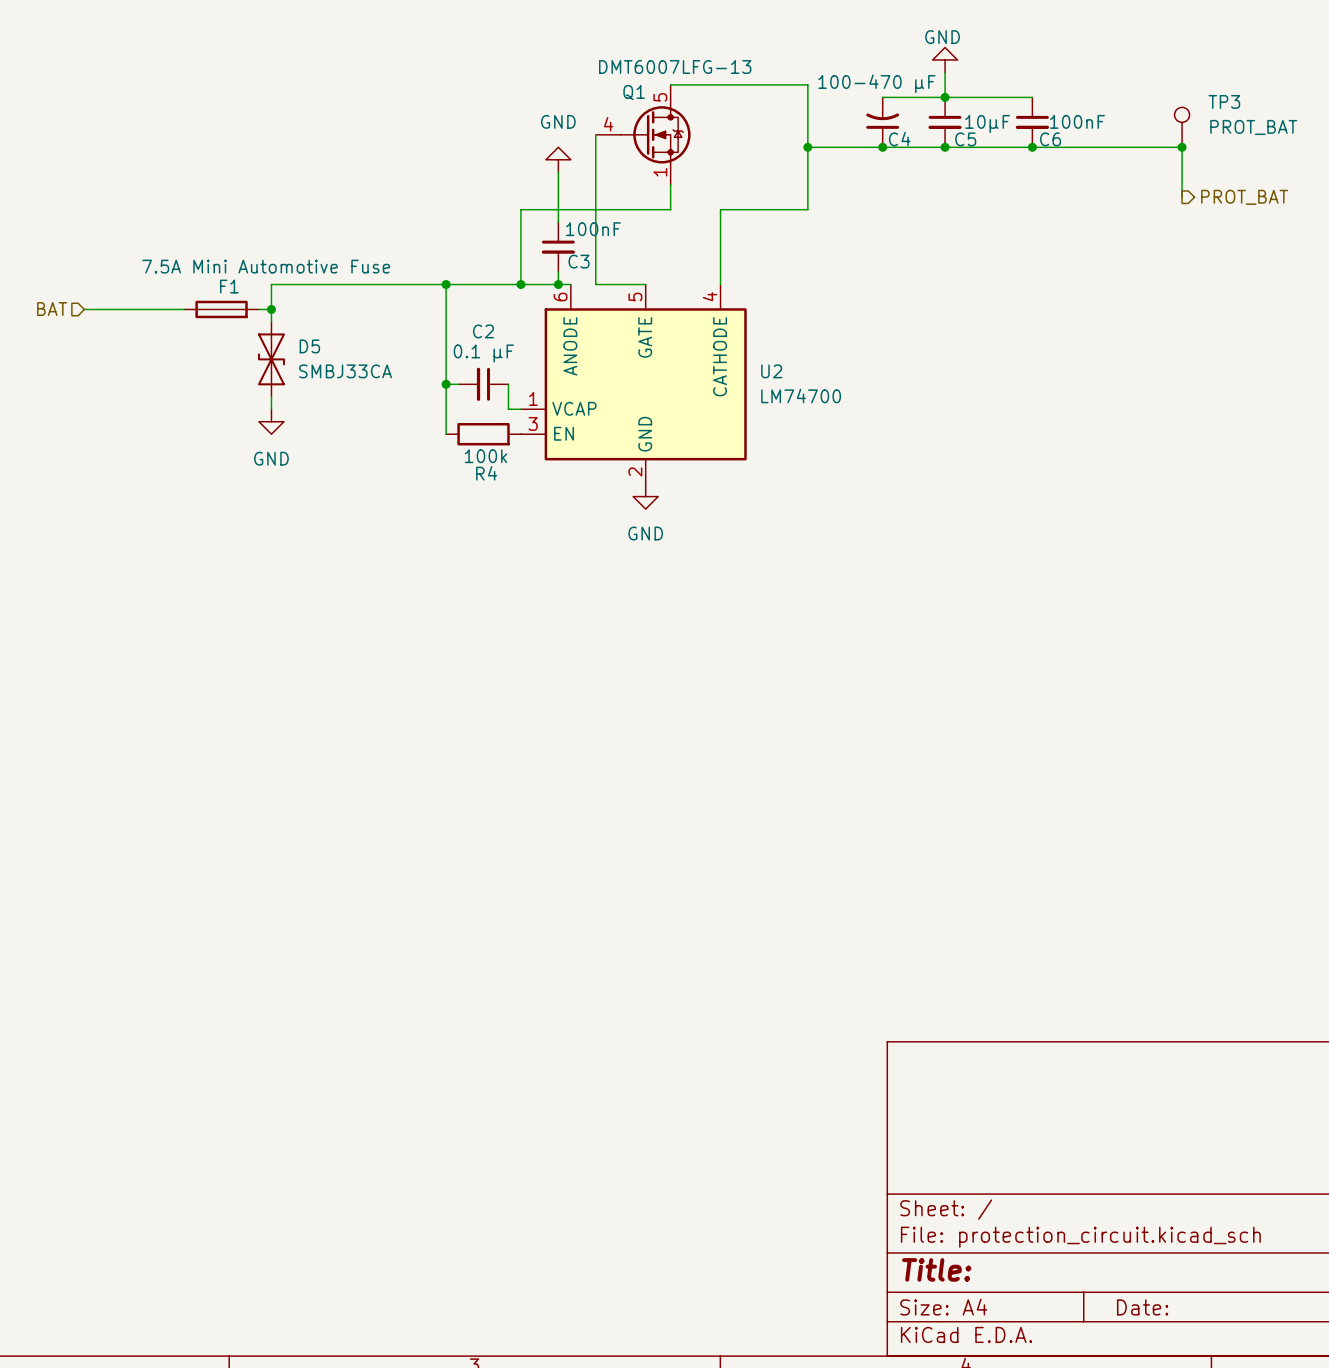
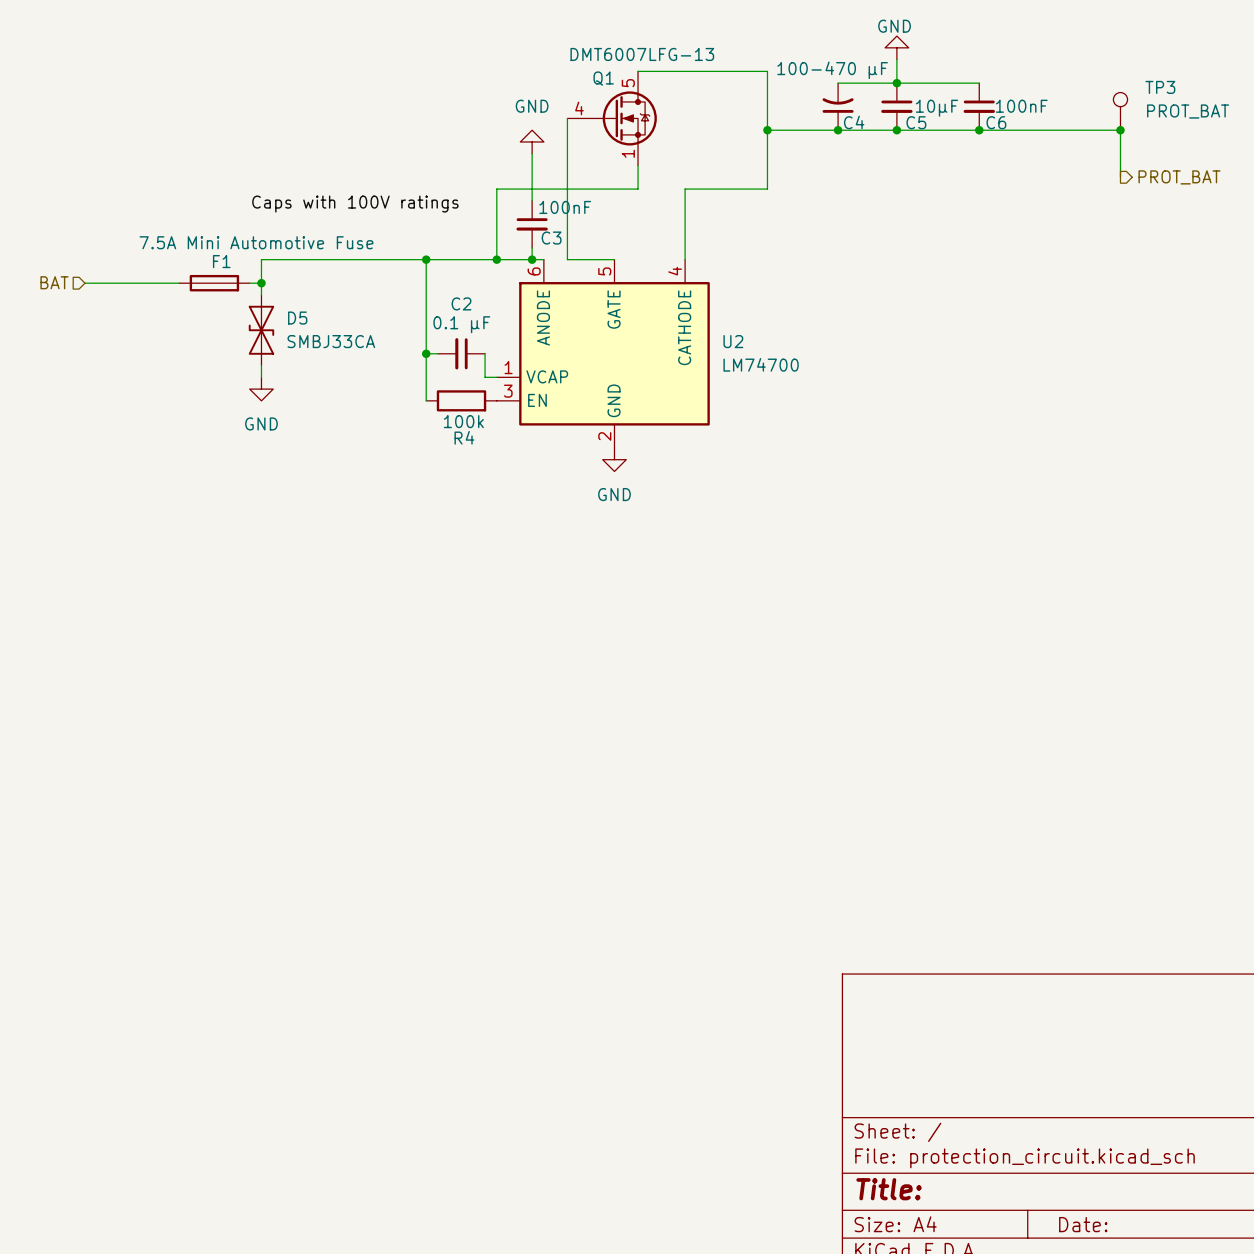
label: none -> Caps with 100V ratings (355, 204)

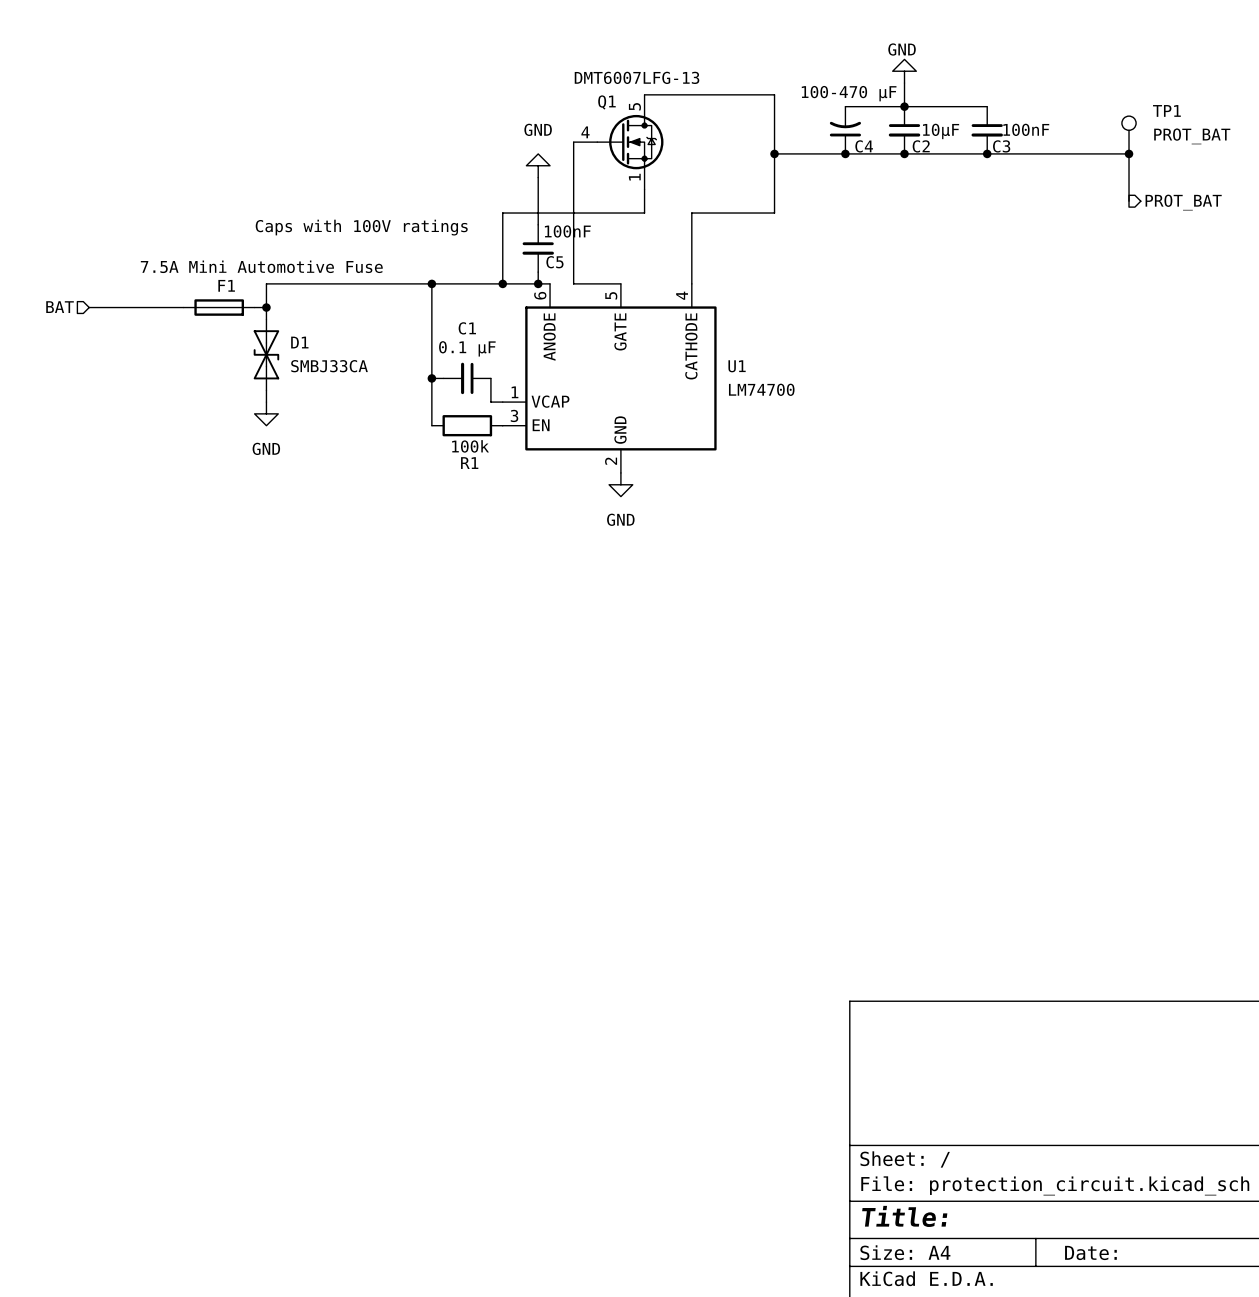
TP3 name: TP3 (1160, 87) -> TP1 (1166, 110)
C5 name: C5 (916, 122) -> C2 (921, 146)
C6 name: C6 (996, 122) -> C3 (1001, 146)
C3 name: C3 (551, 238) -> C5 (554, 262)
C2 name: C2 (461, 303) -> C1 (467, 328)
D5 name: D5 (297, 318) -> D1 (299, 342)
U2 name: U2 (733, 341) -> U1 (737, 366)
R4 name: R4 (464, 437) -> R1 (469, 463)

